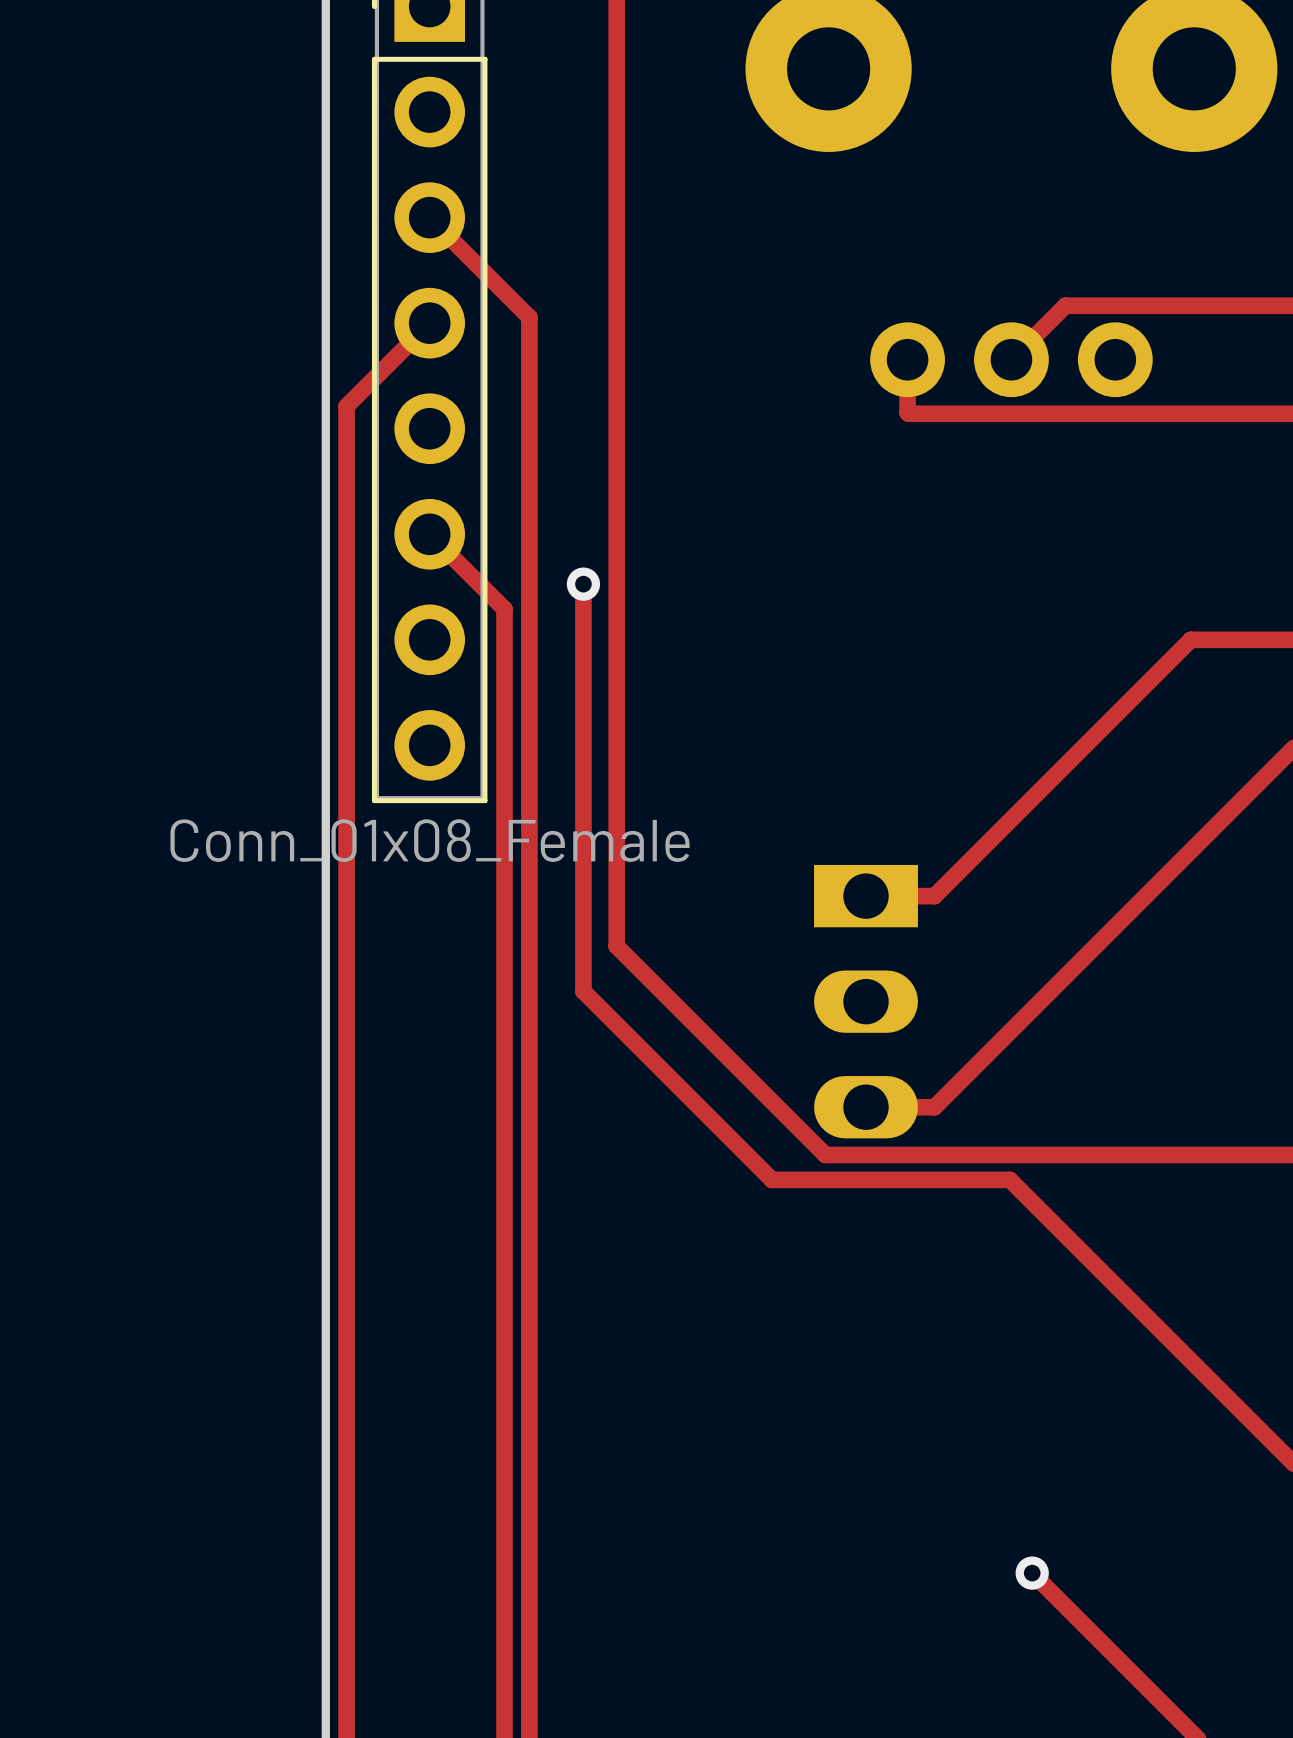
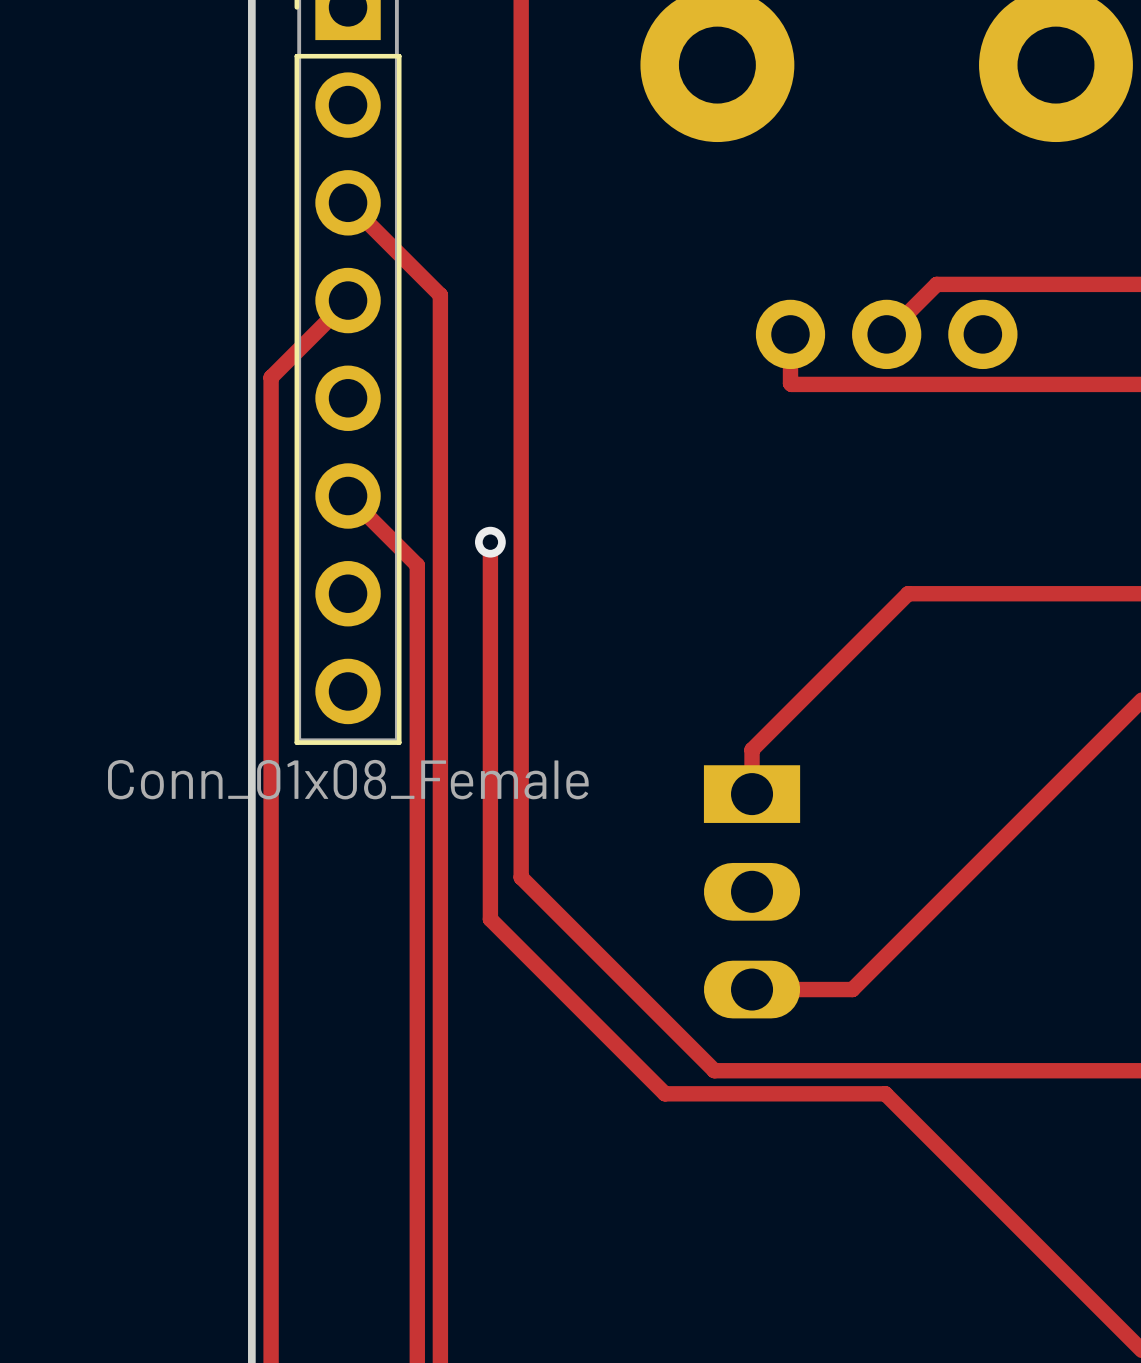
track: (1190, 639) (934, 896) (866, 896) -> (1052, 593) (908, 593) (752, 749) (752, 794)
part position: (866, 1001) -> (752, 891)
track: (974, 1067) (934, 1107) (866, 1107) -> (852, 989) (752, 989)

